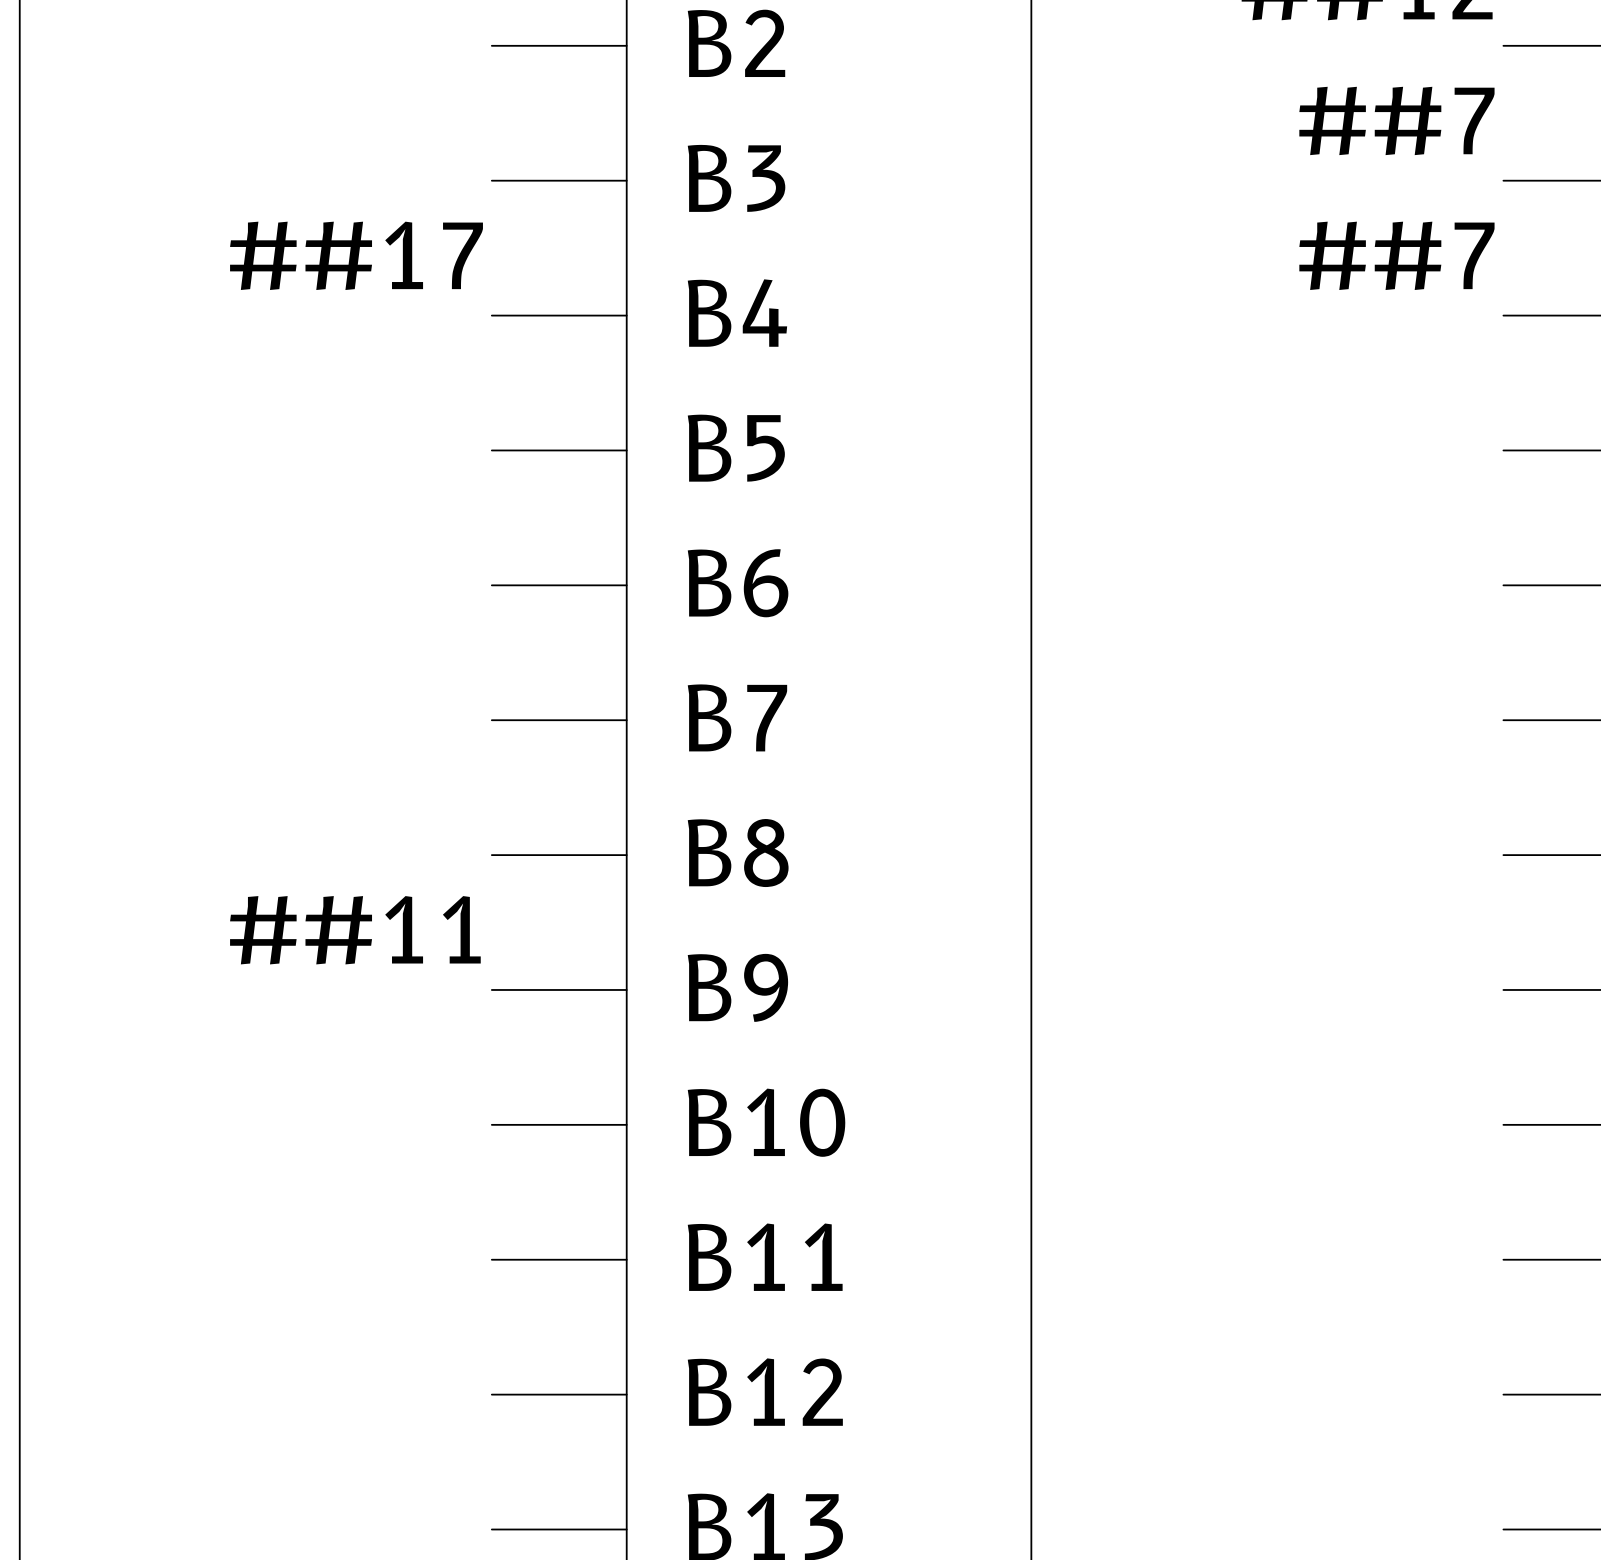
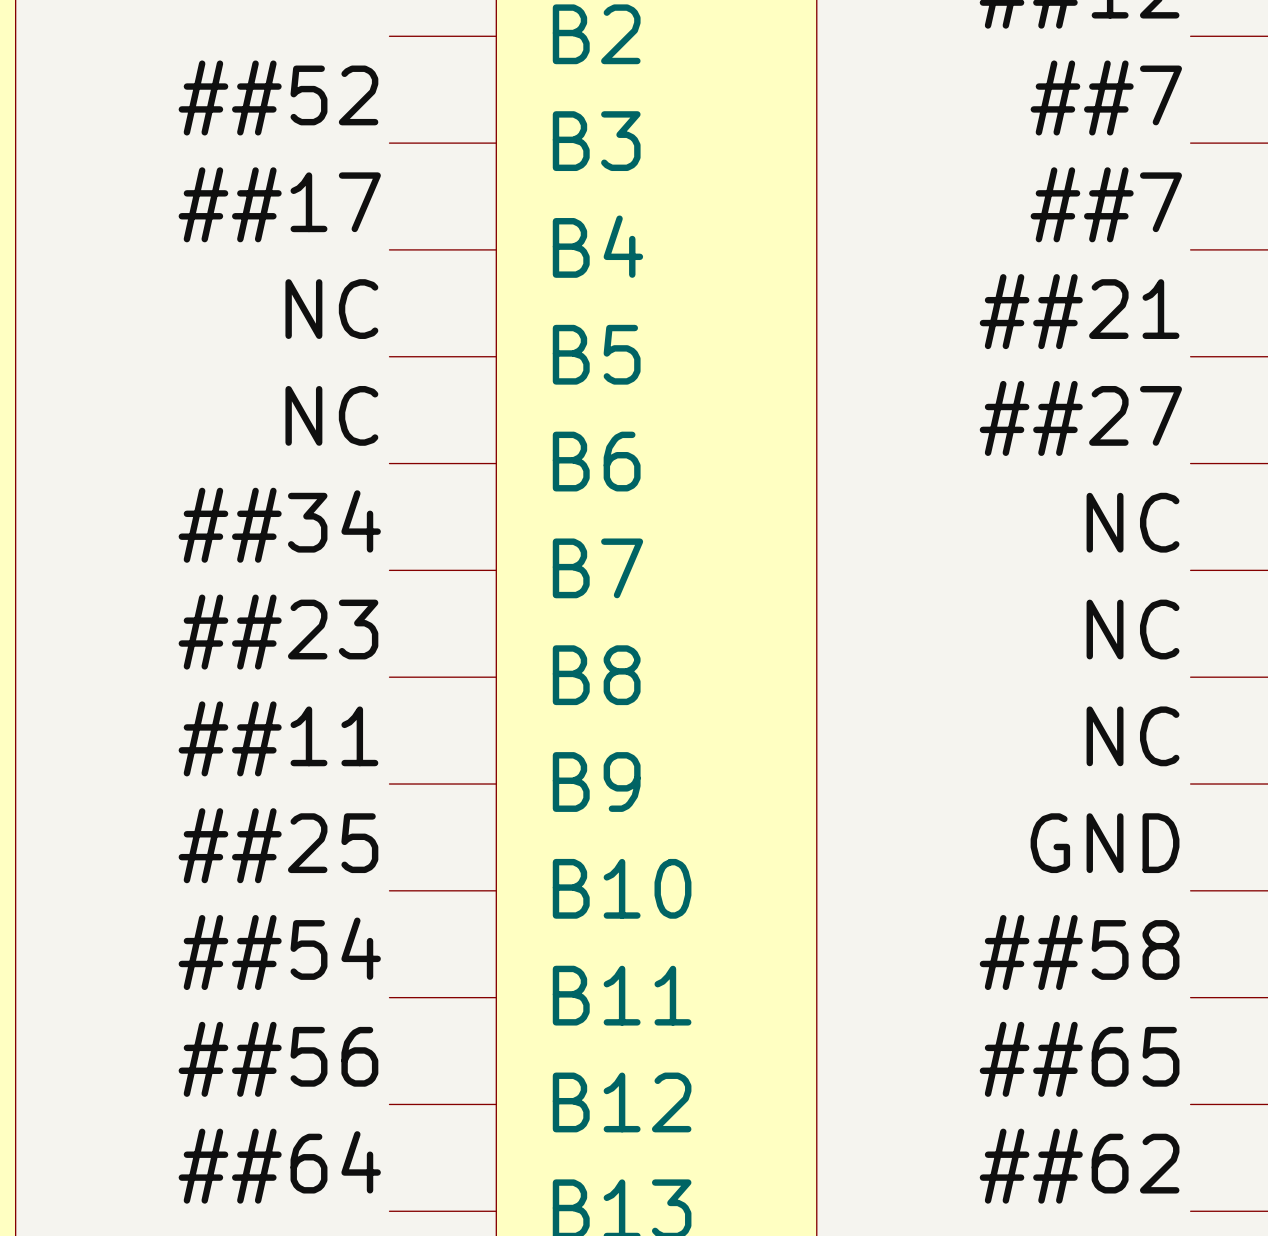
label: none -> ##52 (278, 97)
label: none -> NC (331, 309)
label: none -> ##21 (1079, 311)
label: none -> NC (331, 415)
label: none -> ##27 (1080, 418)
label: none -> ##34 (279, 525)
label: none -> NC (1133, 522)
label: none -> ##23 (278, 632)
label: none -> NC (1133, 629)
label: none -> NC (1133, 736)
label: none -> ##25 (278, 845)
label: none -> GND (1105, 843)
label: none -> ##54 (279, 952)
label: none -> ##58 (1079, 952)
label: none -> ##56 (278, 1059)
label: none -> ##65 (1079, 1059)
label: none -> ##64 (279, 1166)
label: none -> ##62 (1079, 1166)

